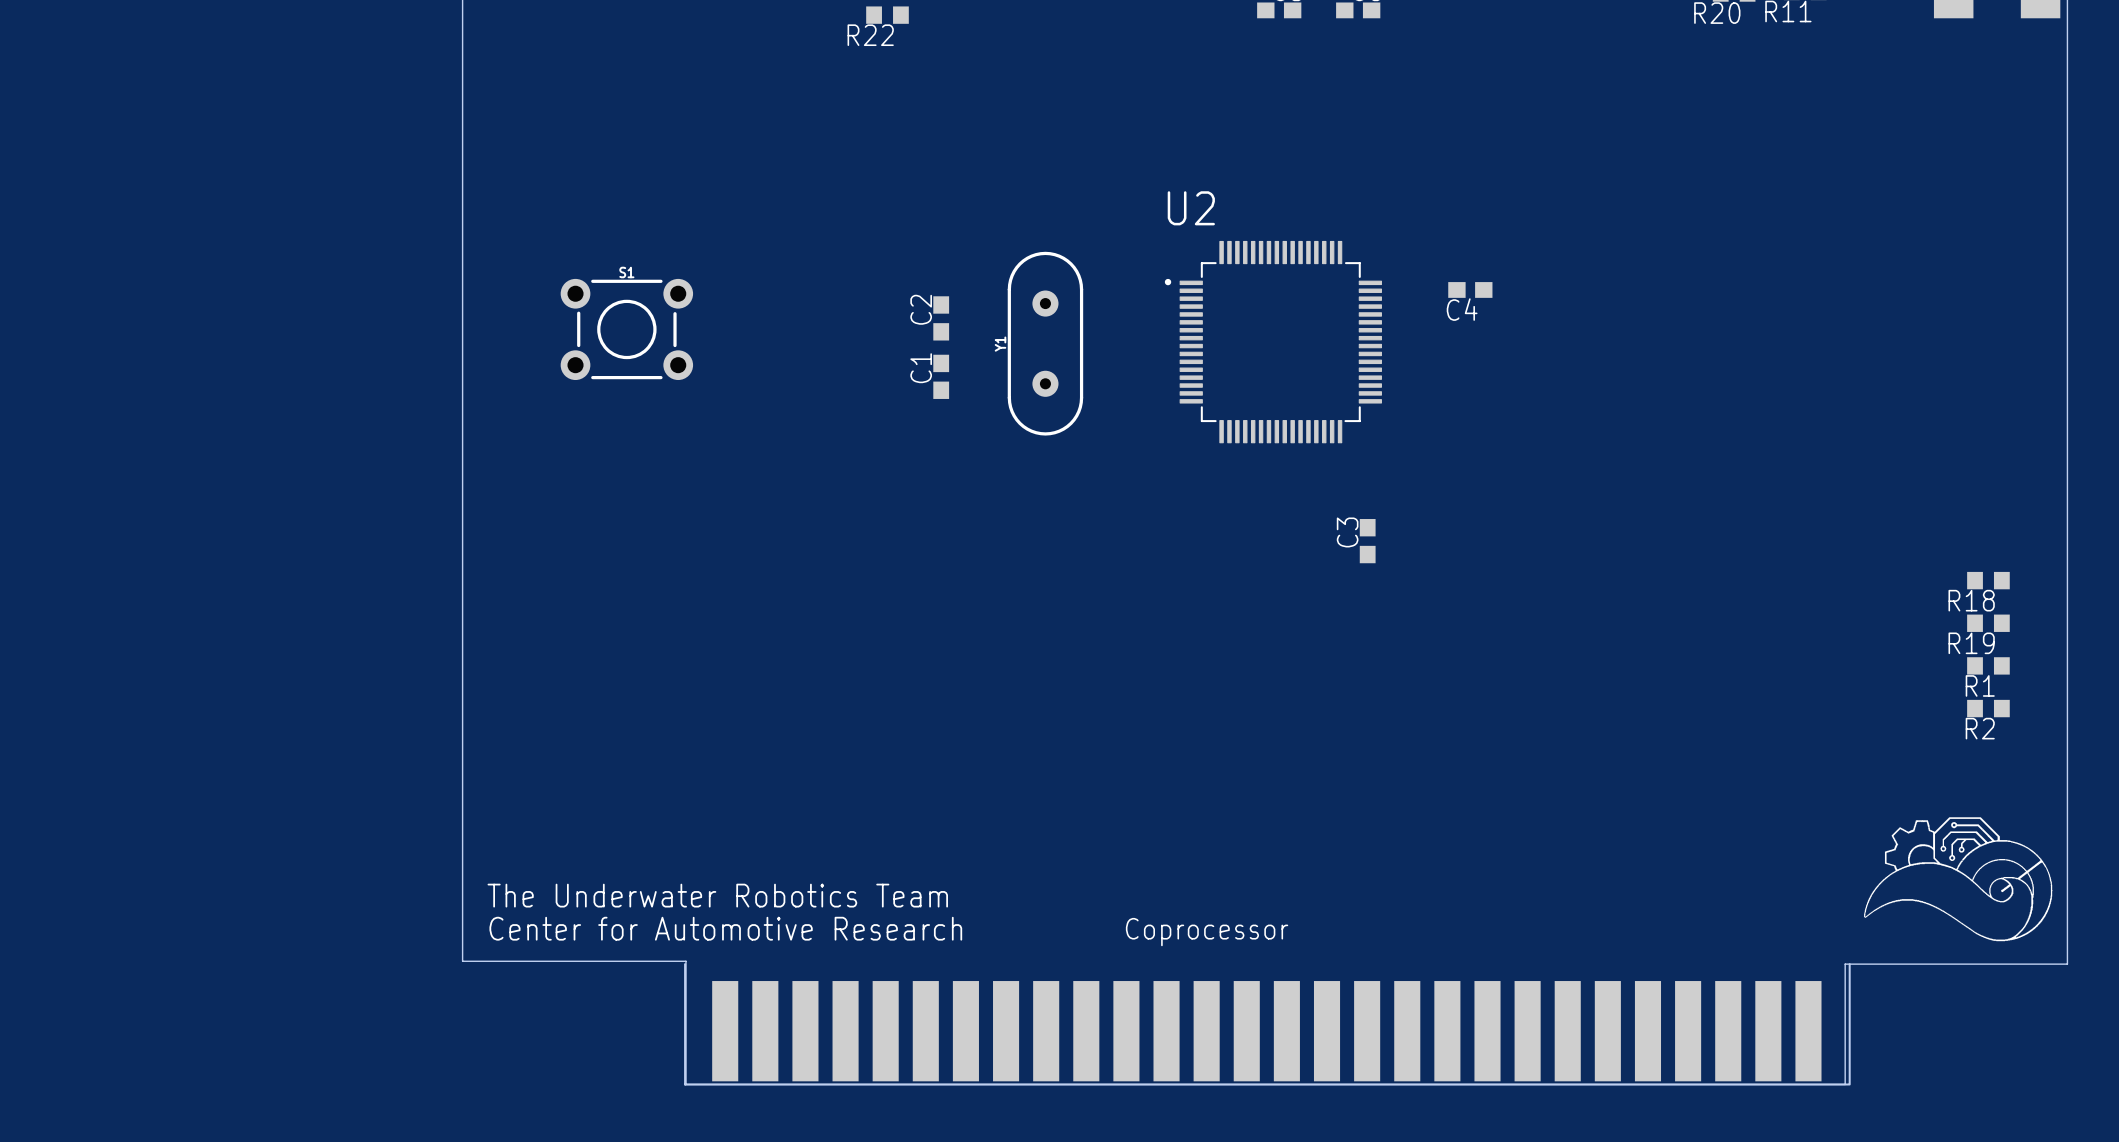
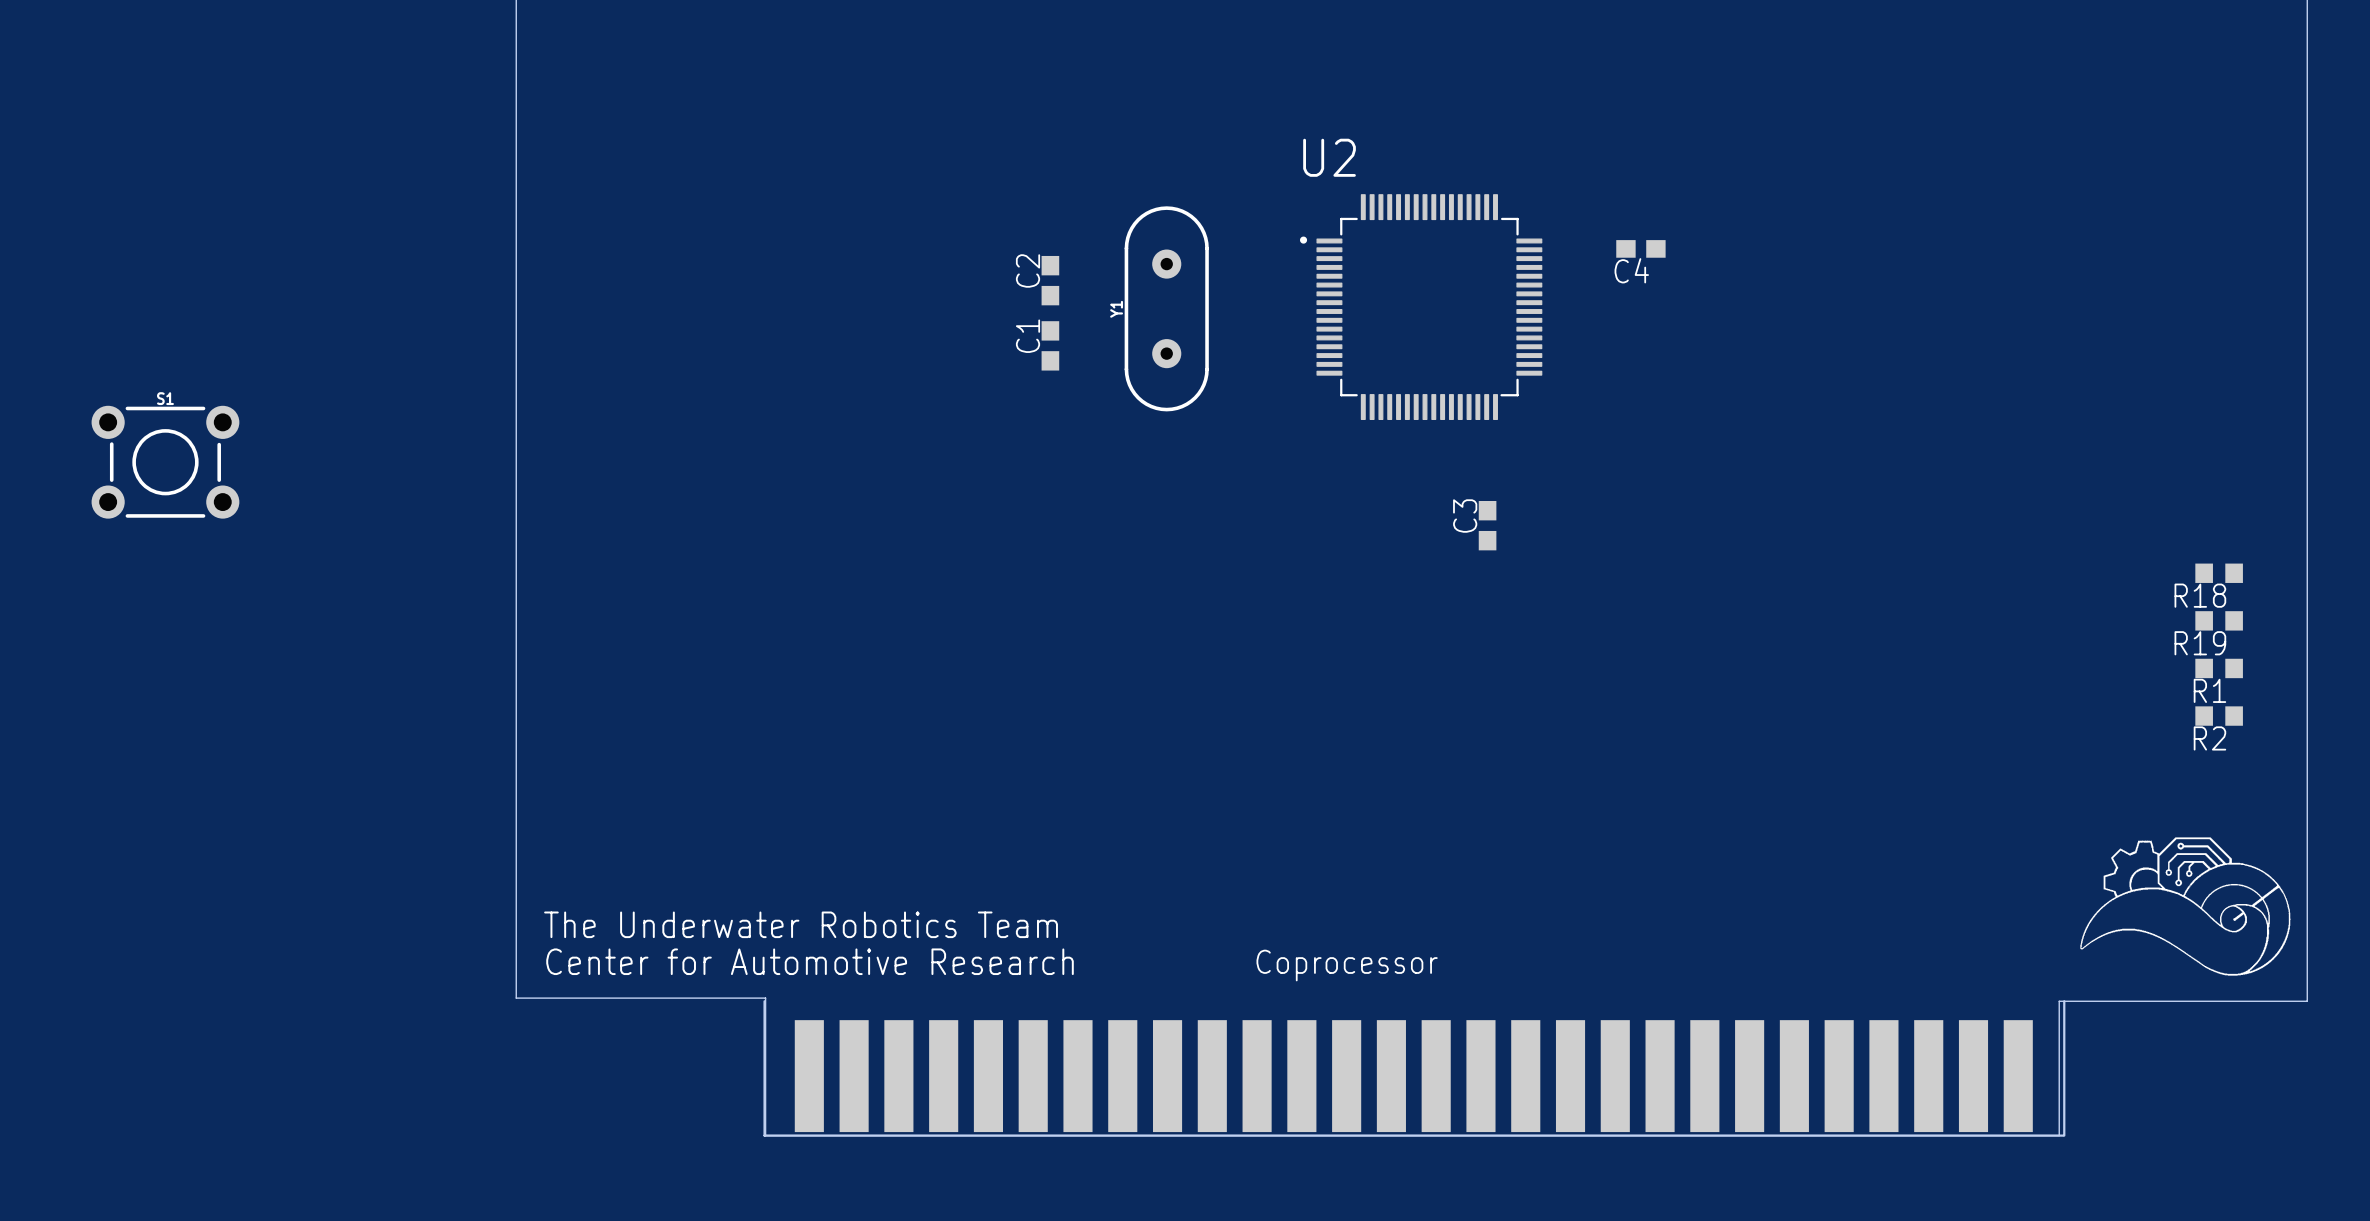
S1 position: (626, 329) -> (165, 462)
C3 position: (1367, 541) -> (1487, 525)

